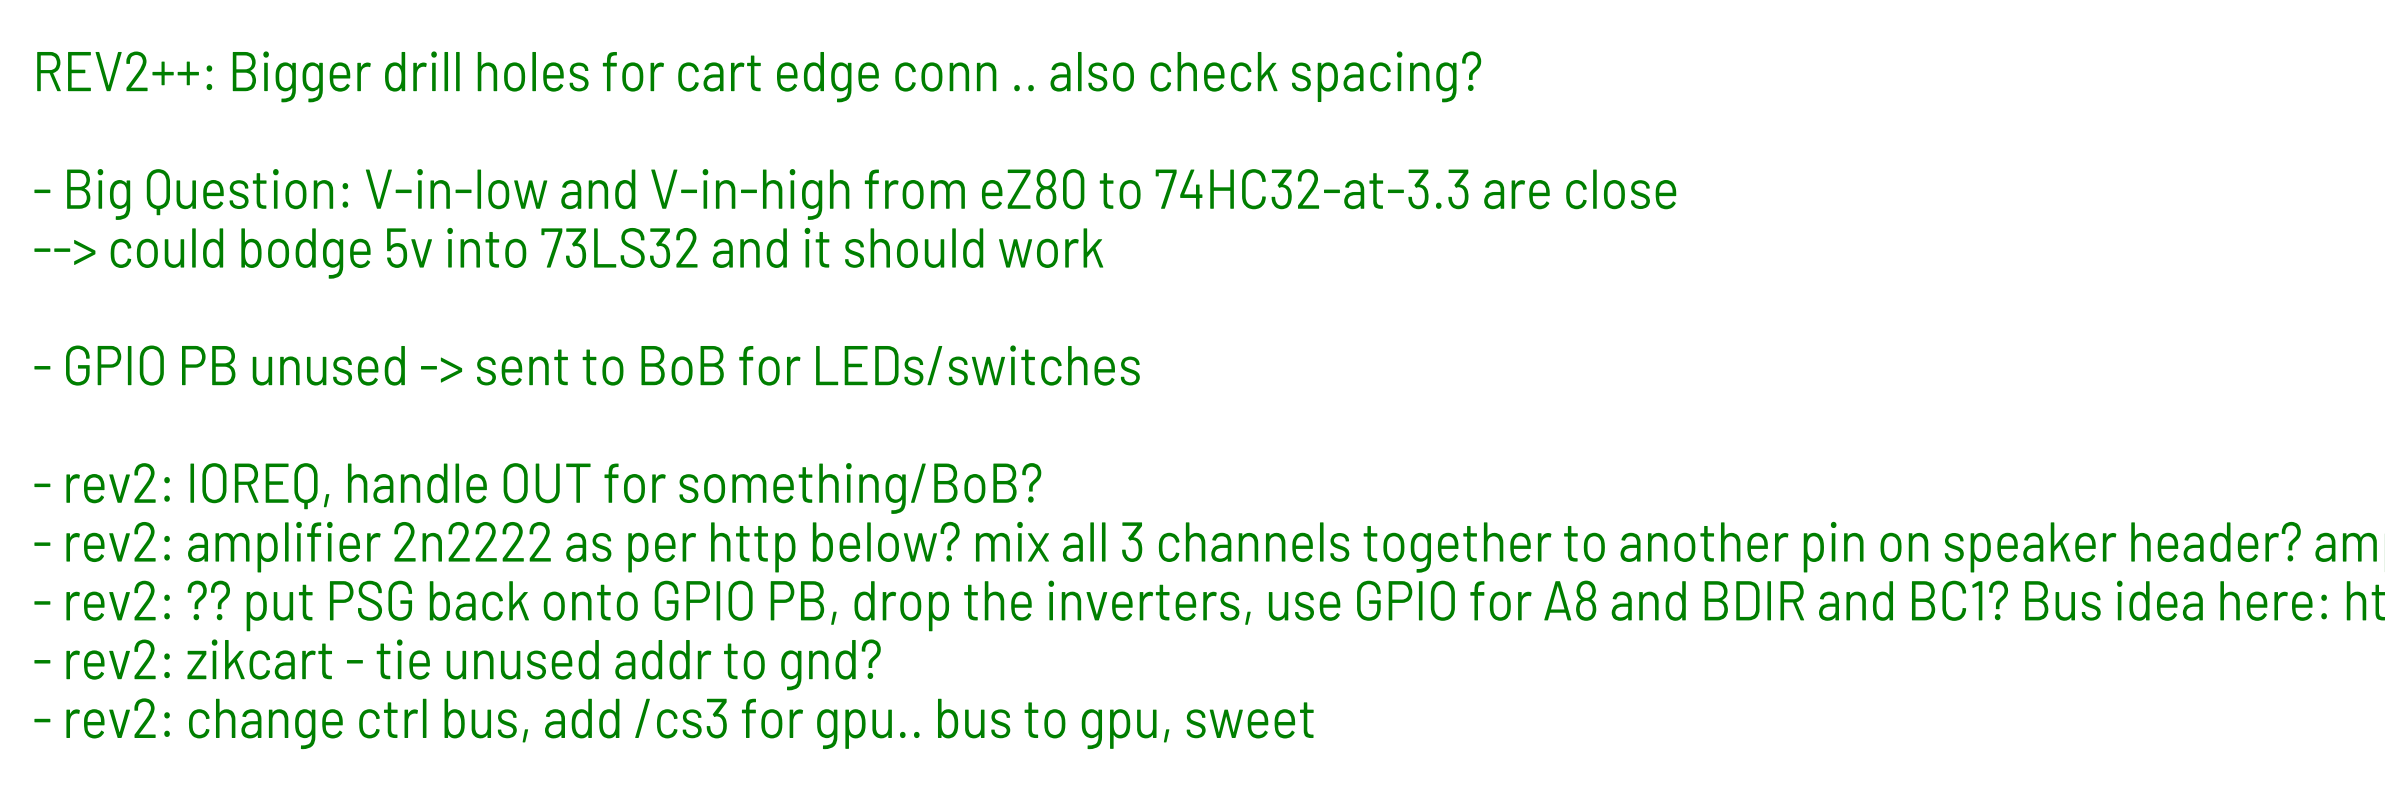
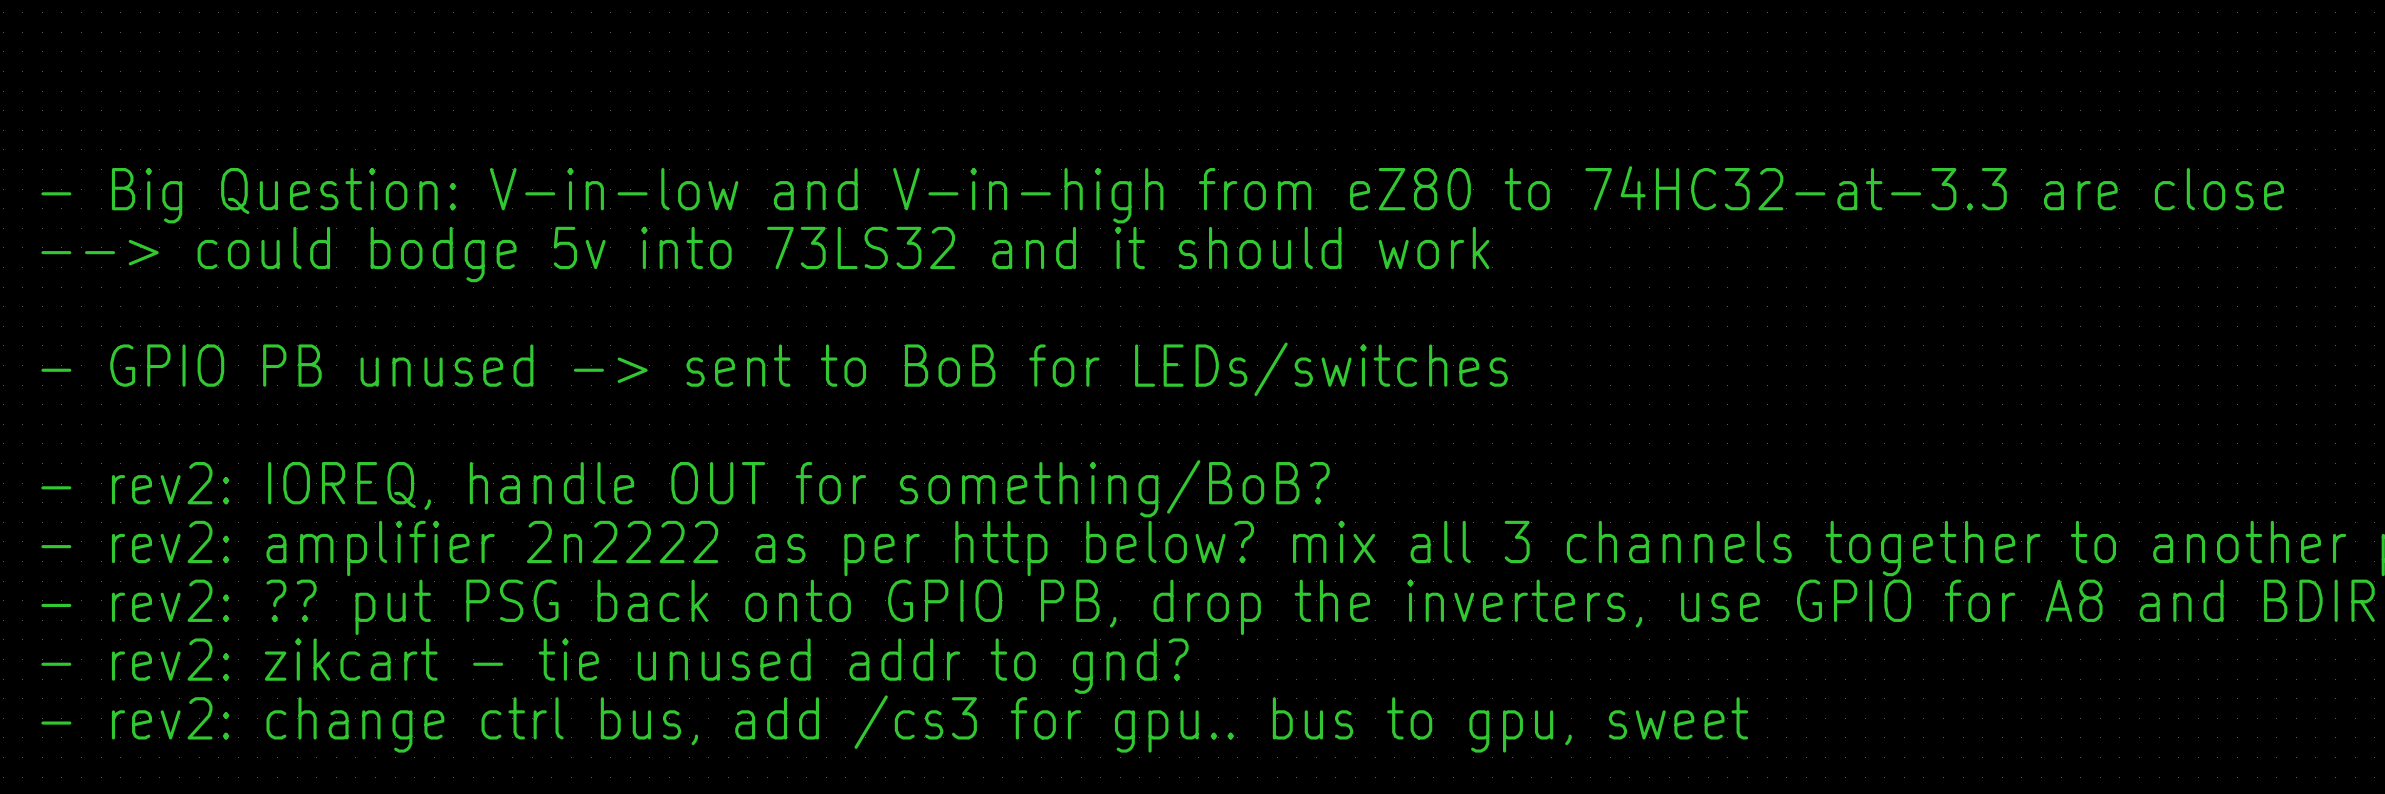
text: REV2++: Bigger drill holes for cart edge conn .. also check spacing? (759, 76) -> none

